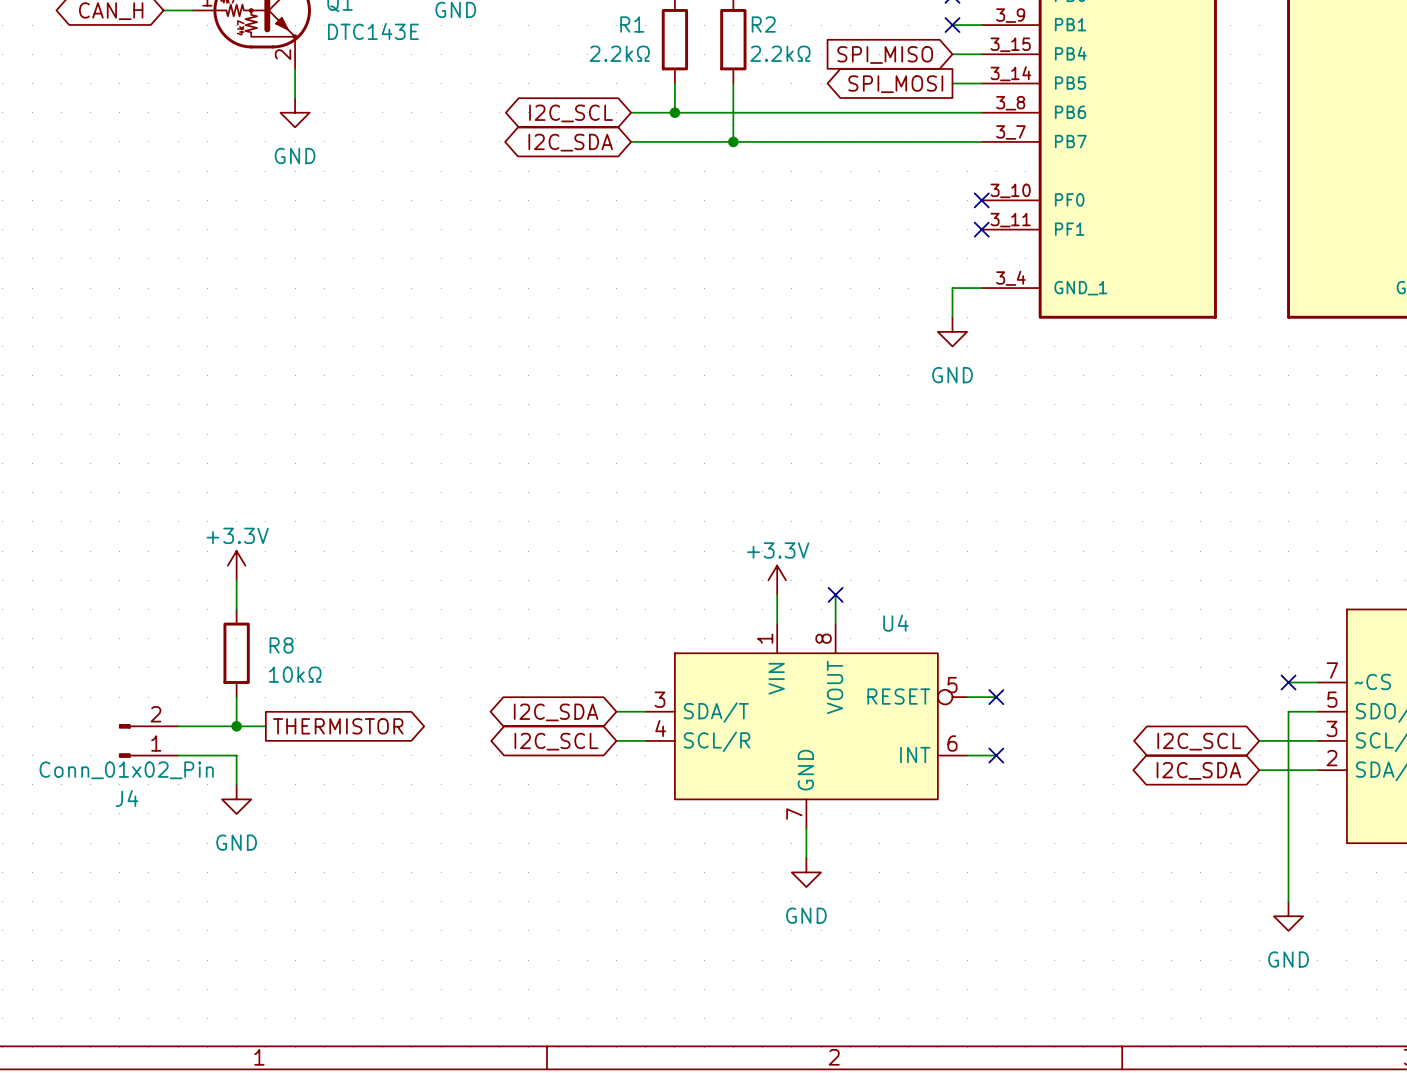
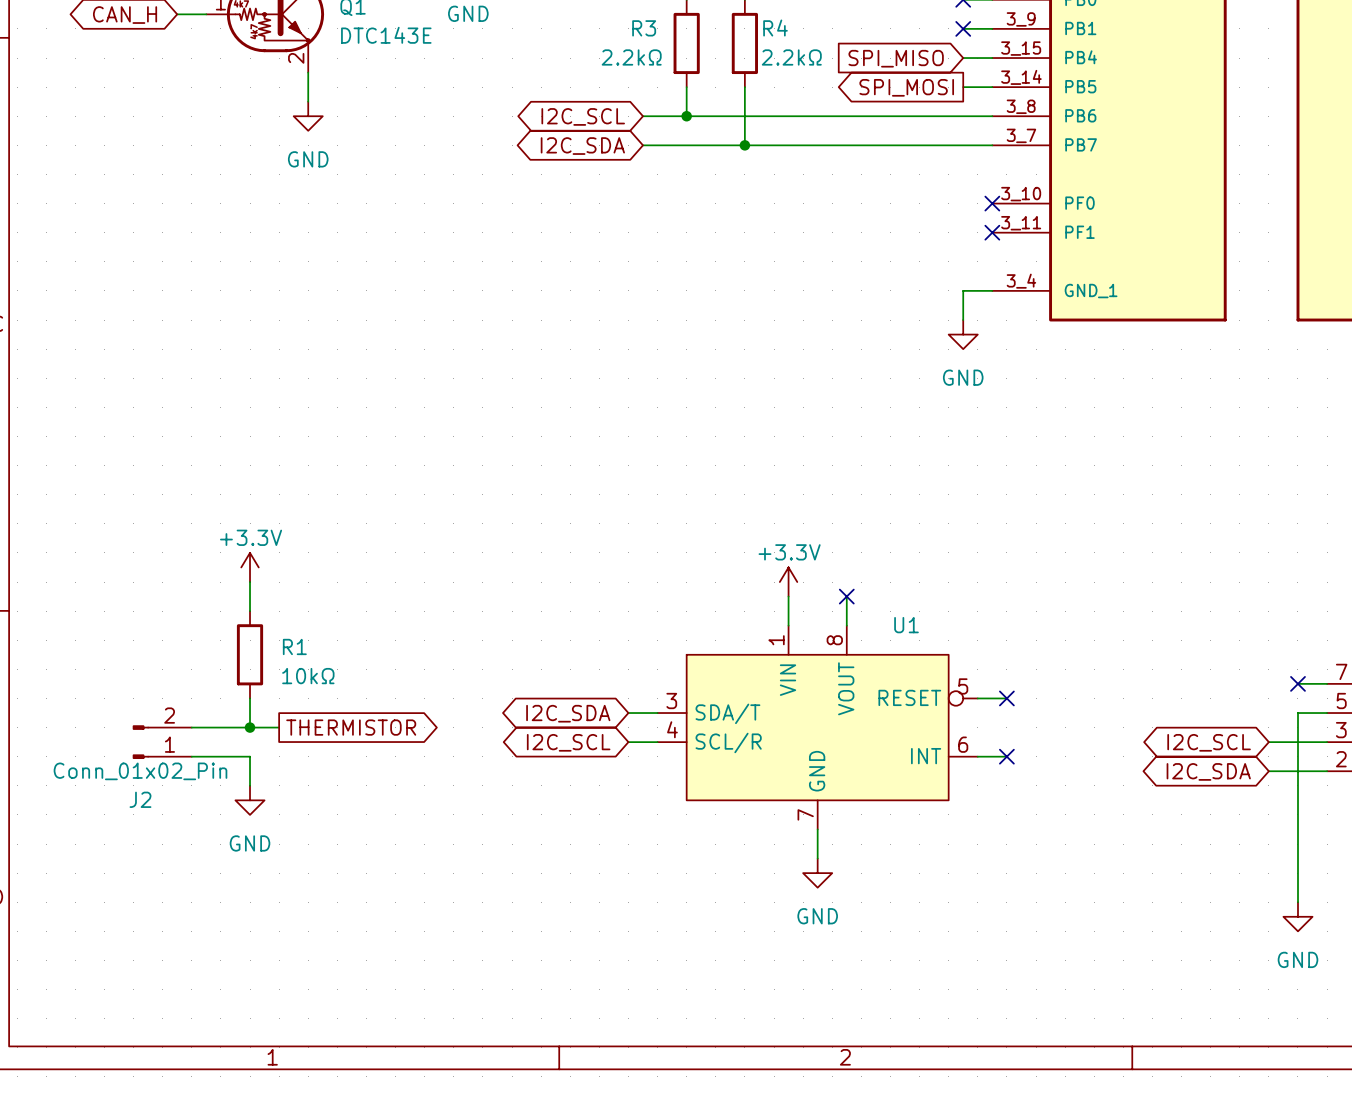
R1 name: R1 (632, 24) -> R3 (644, 28)
R2 name: R2 (763, 24) -> R4 (775, 28)
U4 name: U4 (895, 623) -> U1 (906, 625)
R8 name: R8 (281, 645) -> R1 (294, 646)
J4 name: J4 (127, 798) -> J2 (140, 799)

